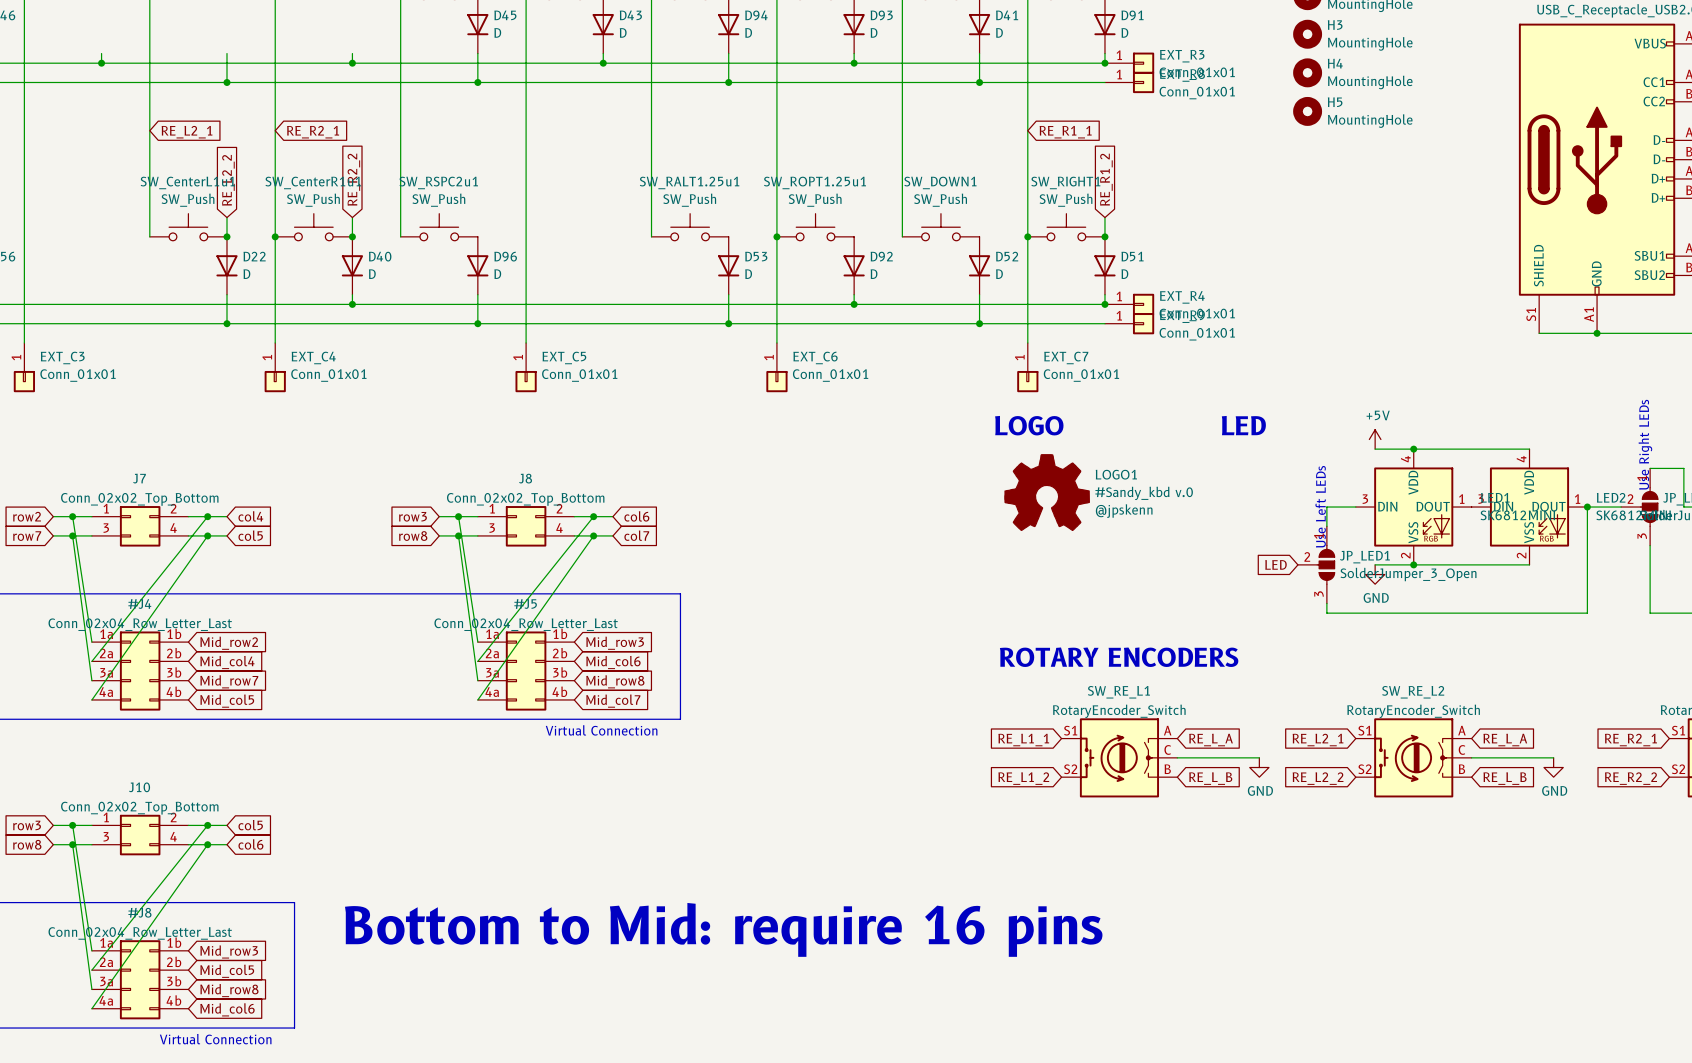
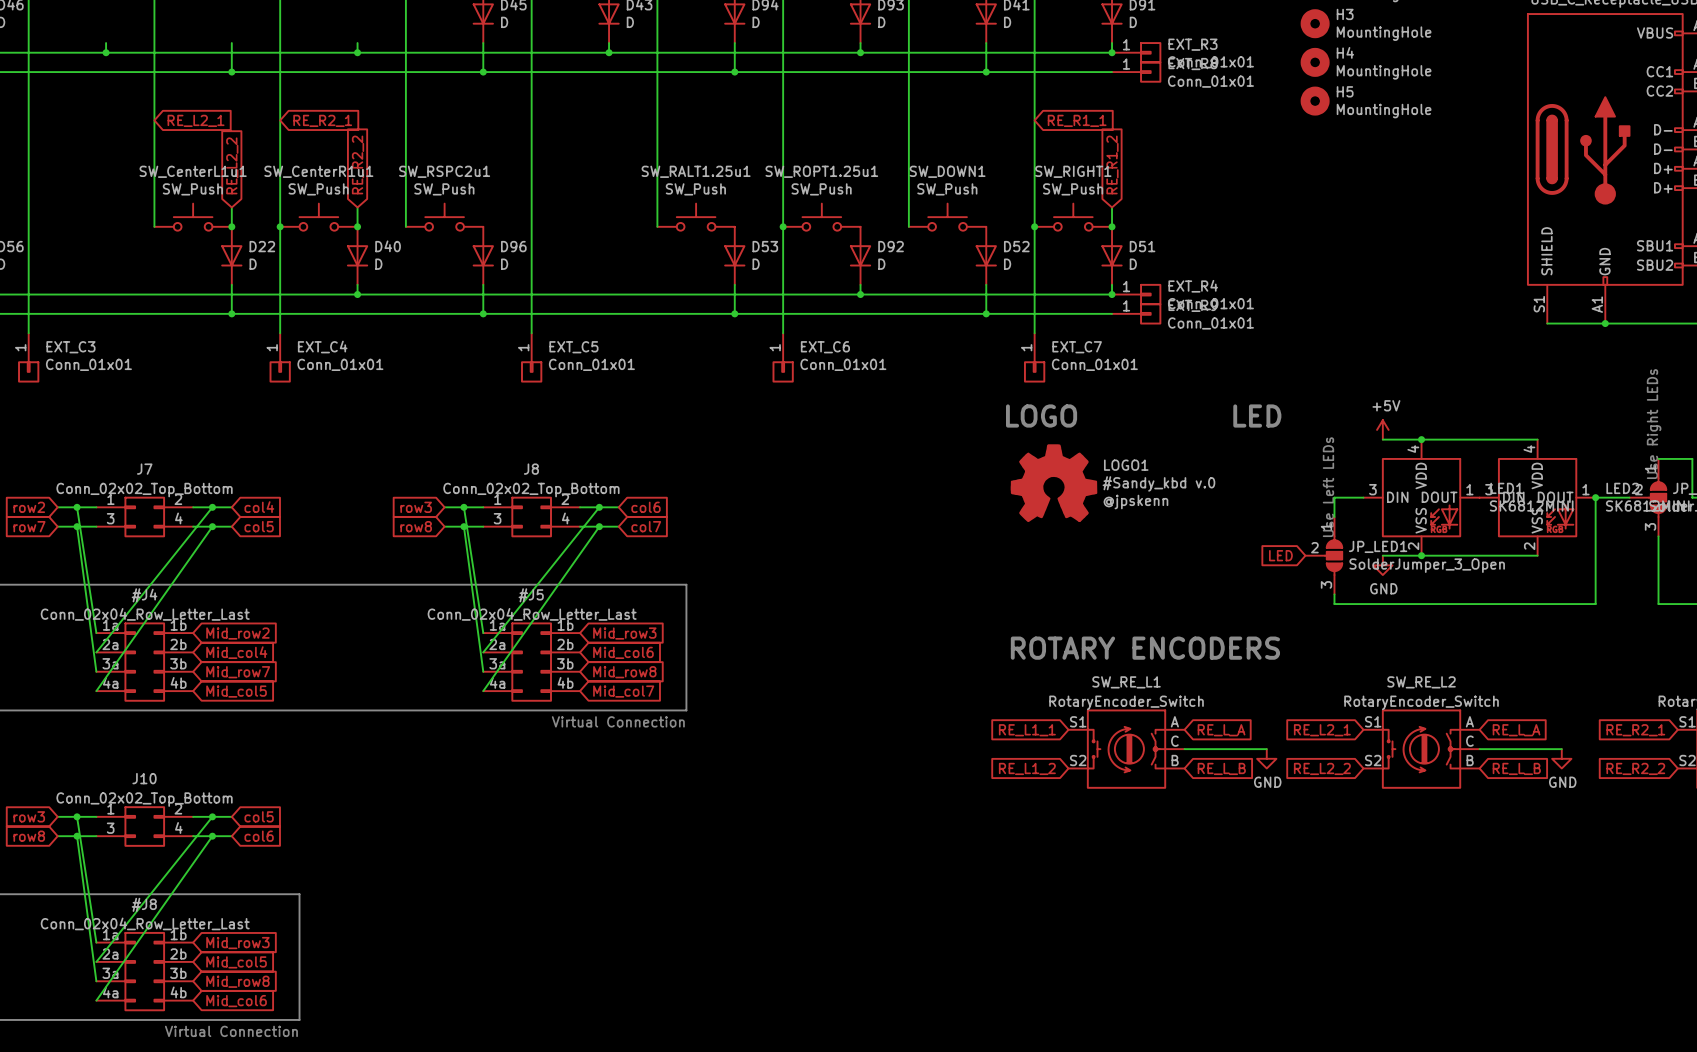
text: Bottom to Mid: require 16 pins (723, 929) -> none

